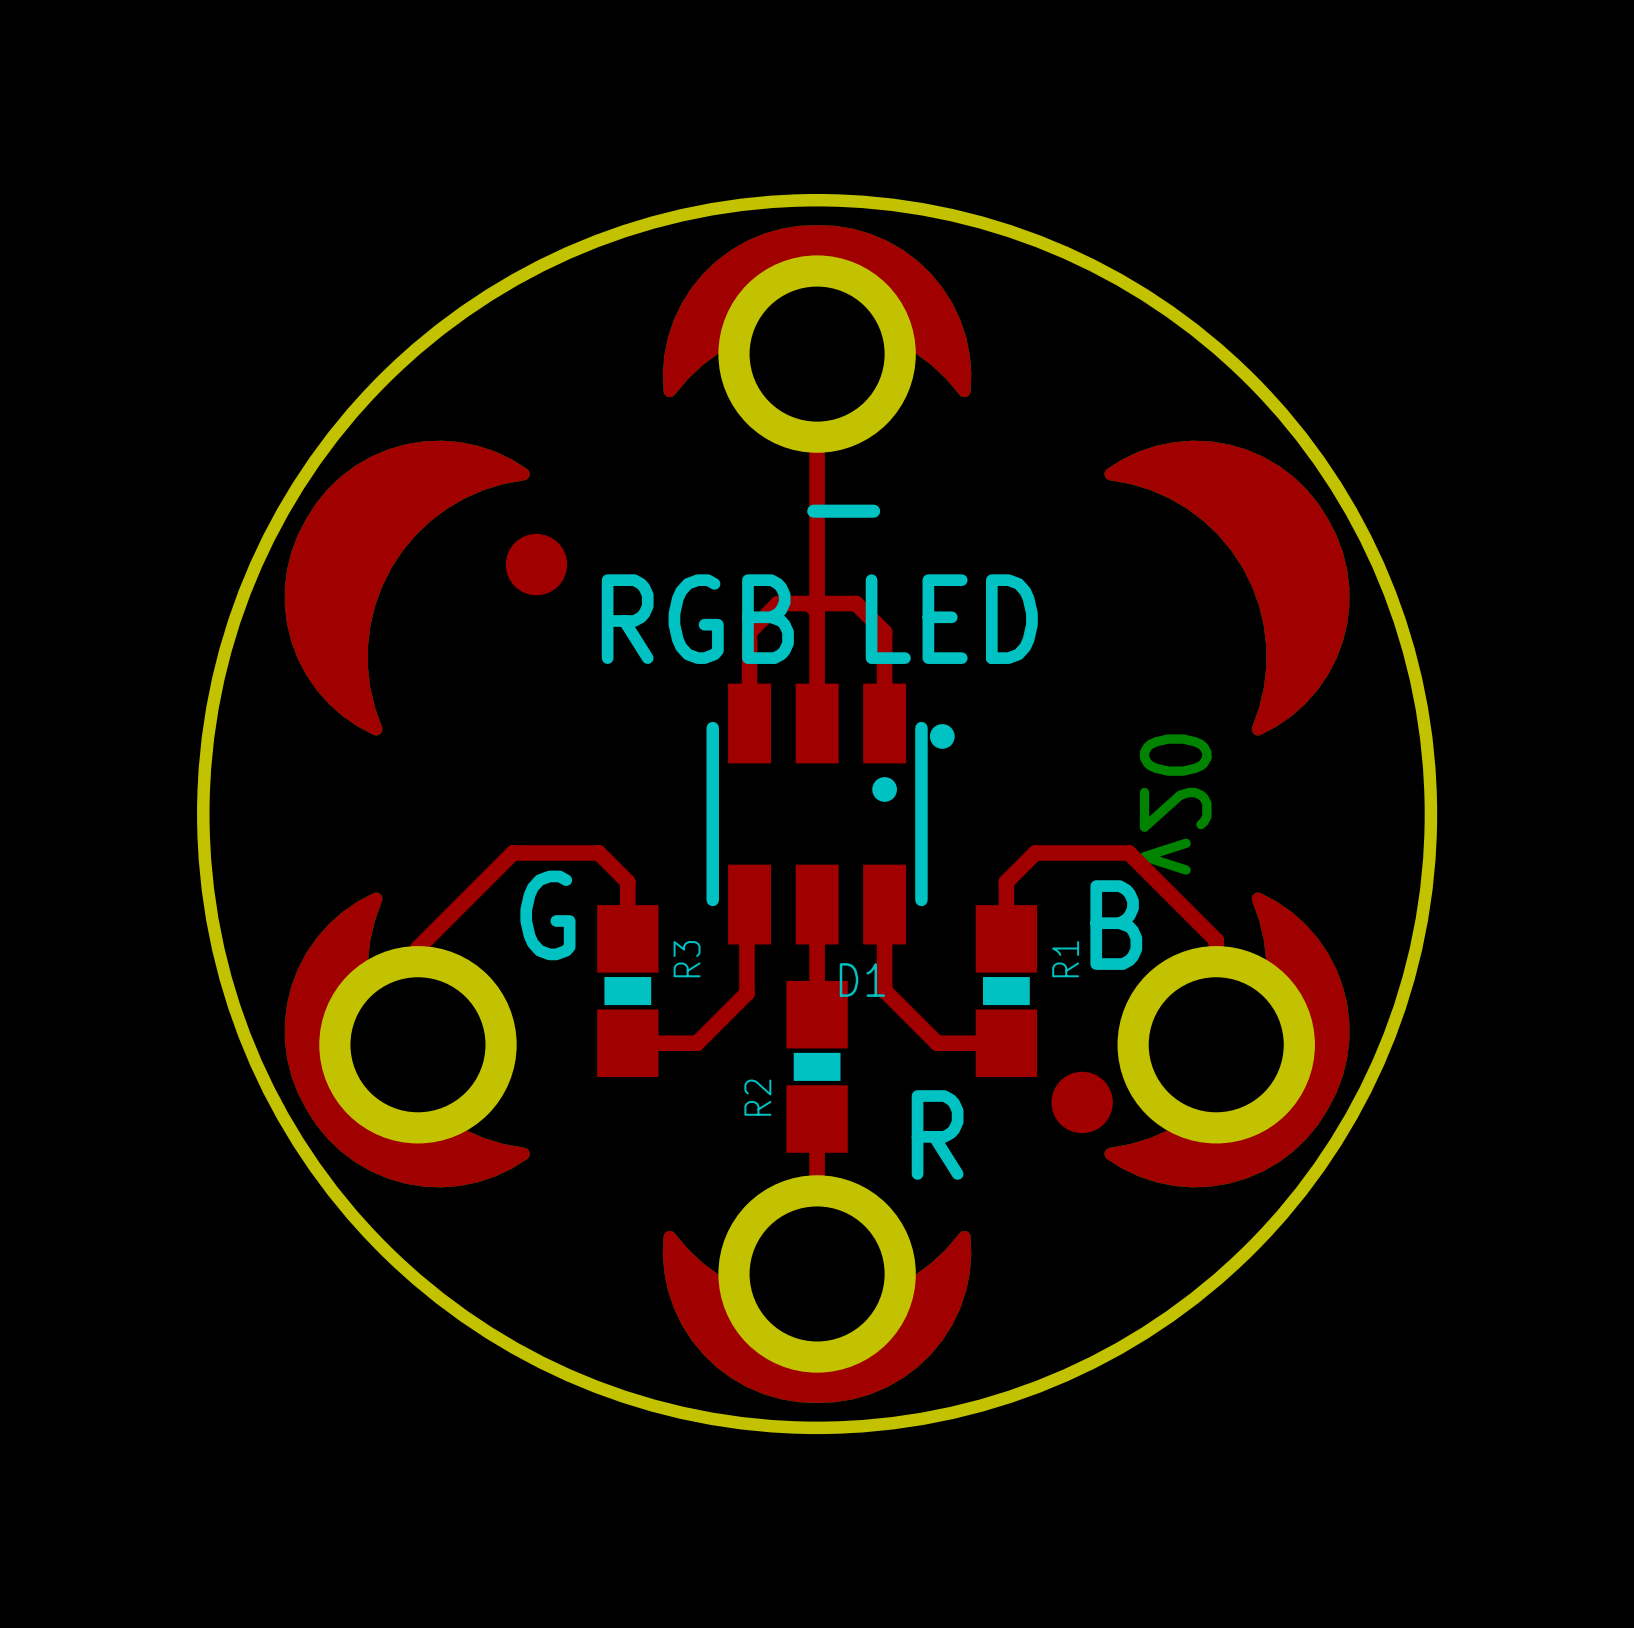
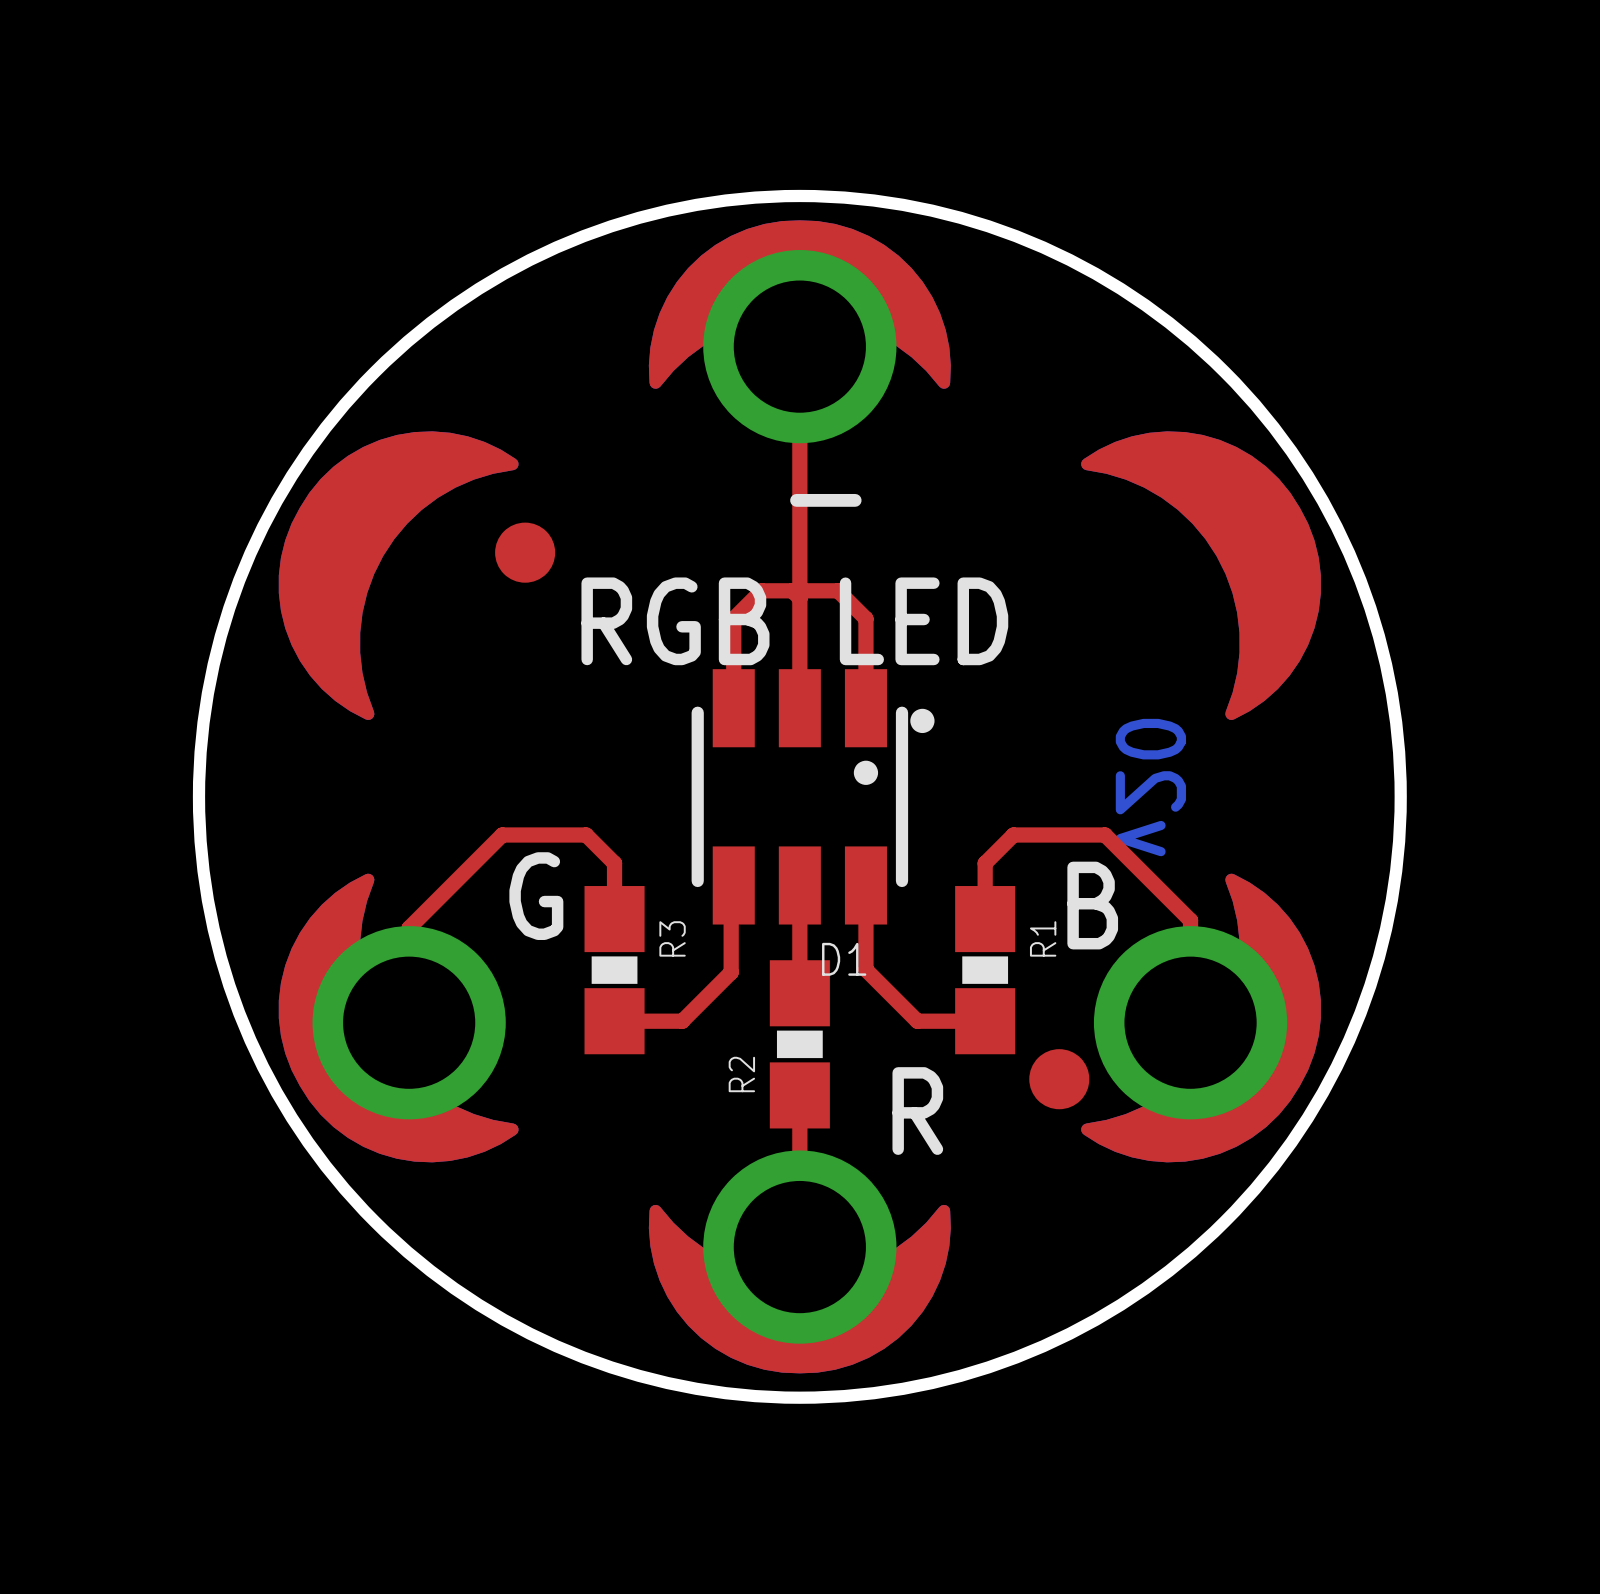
text position: RGB LED (819, 619) -> RGB LED (794, 621)

